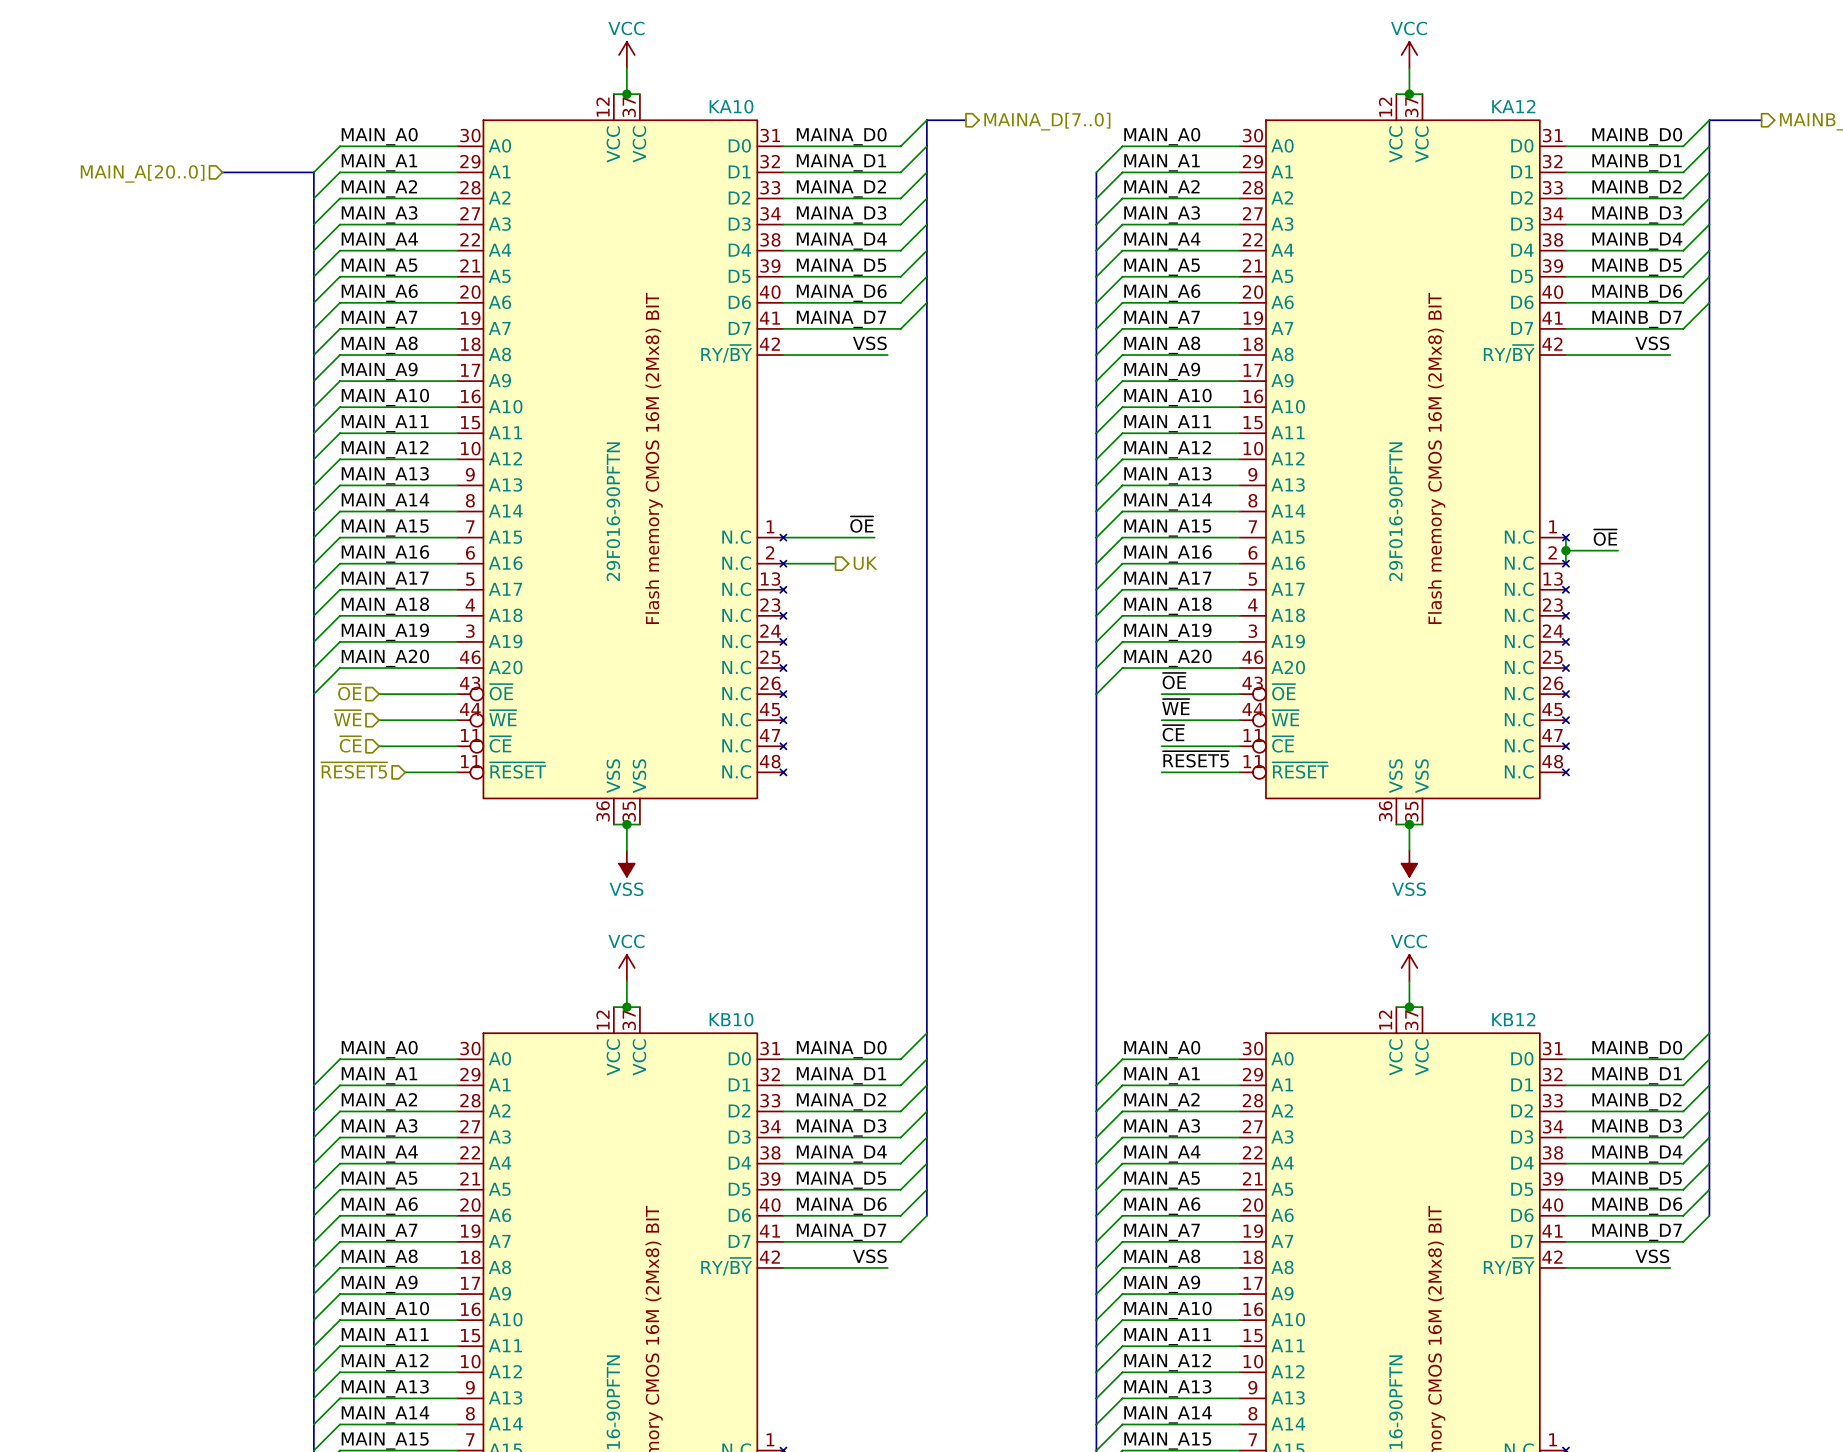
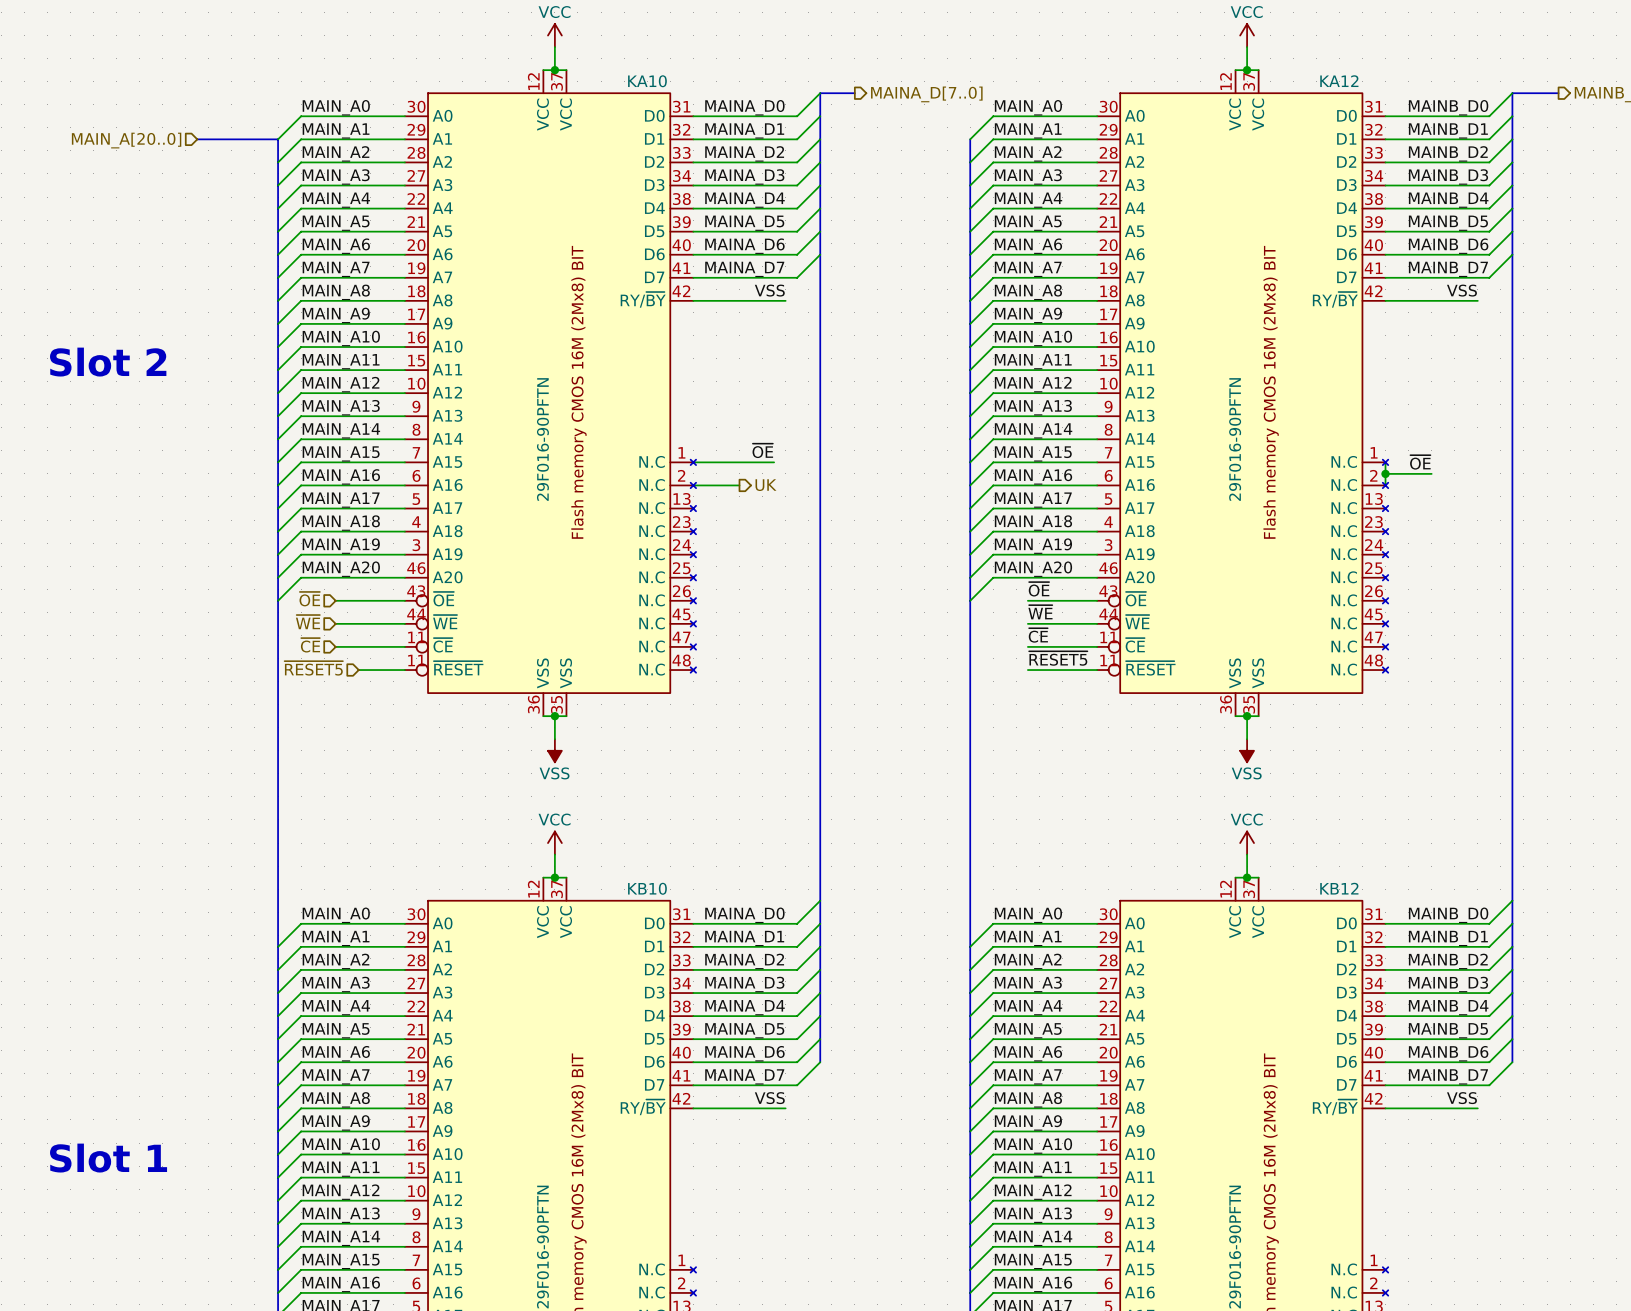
text: none -> Slot 2 (108, 362)
text: none -> Slot 1 (108, 1158)

